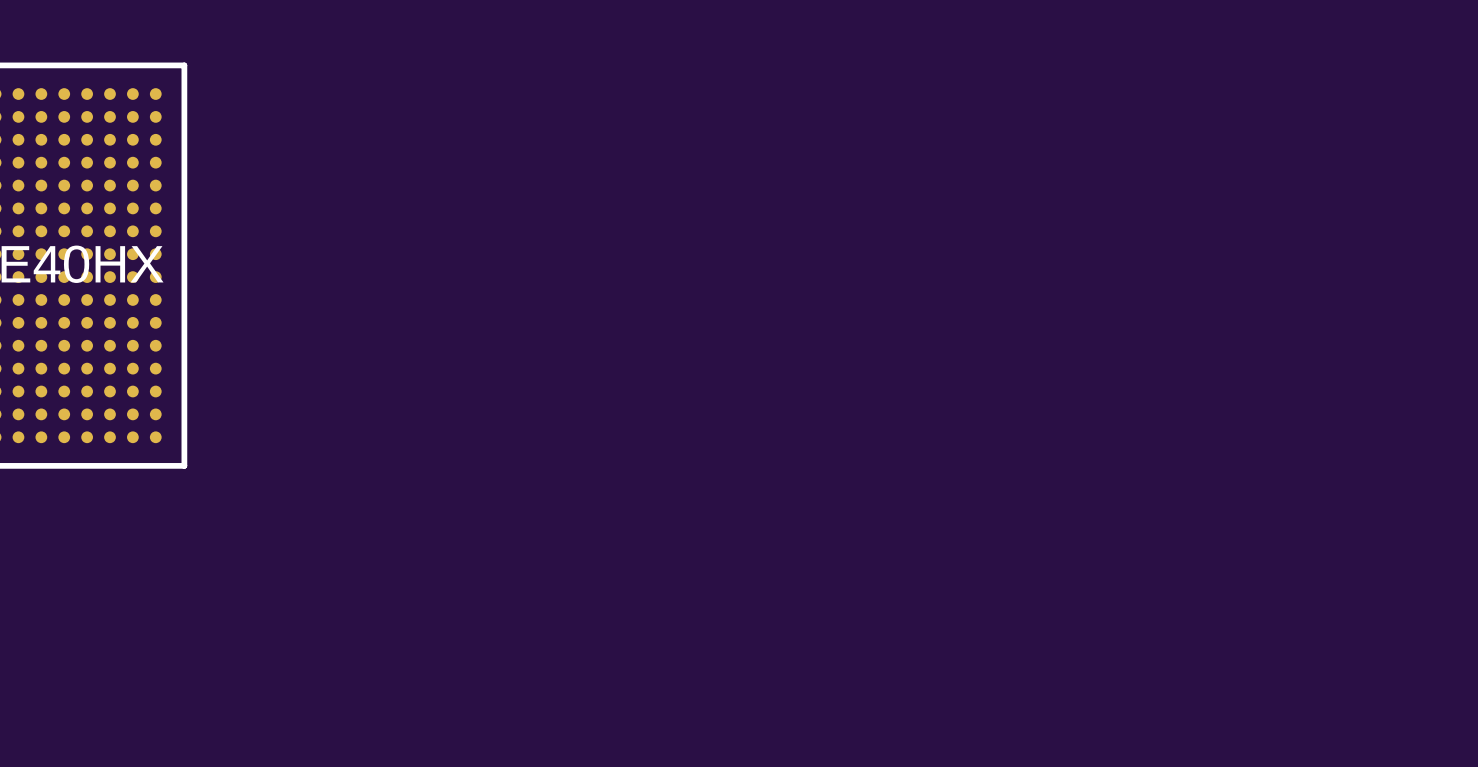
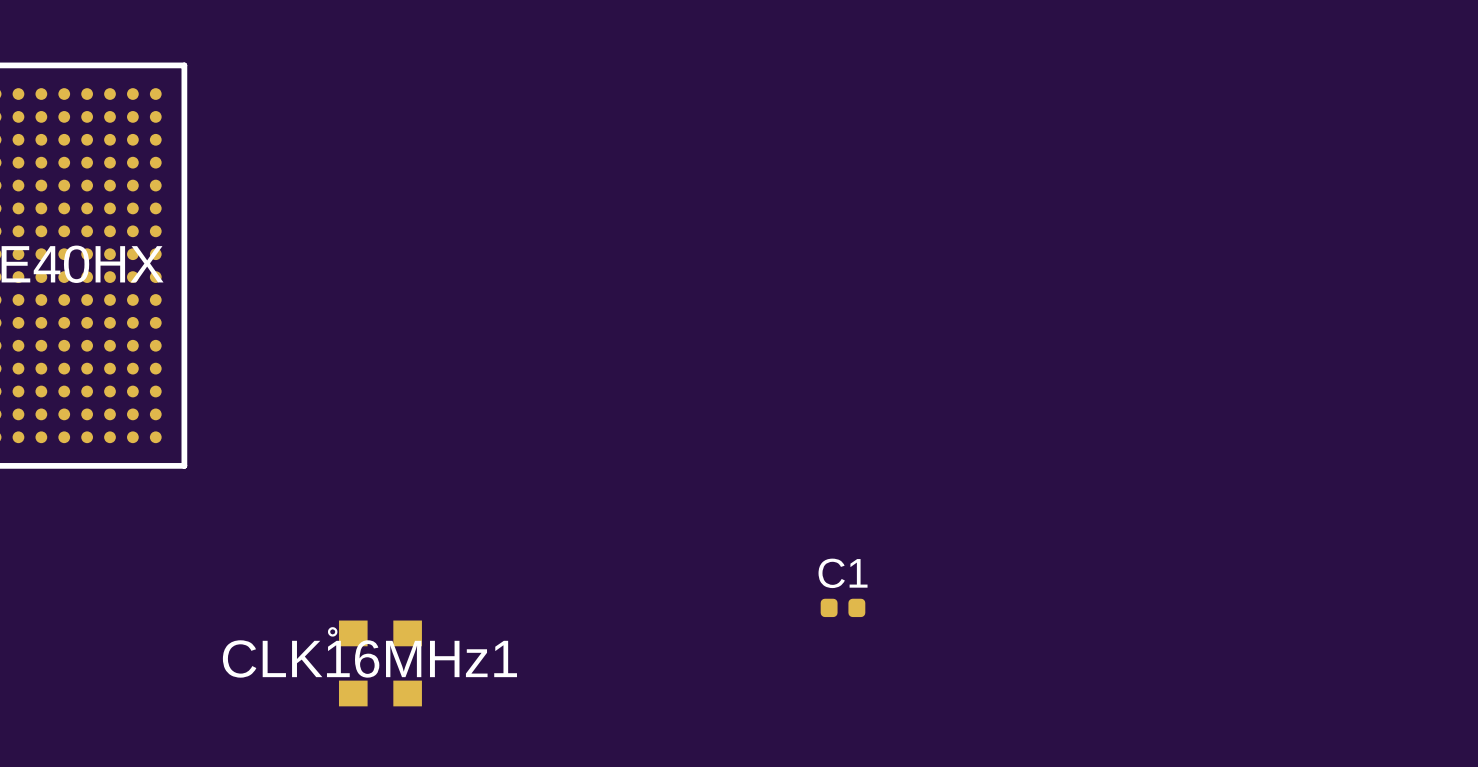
C1: none -> (842, 607)
CLK16MHz1: none -> (374, 663)

